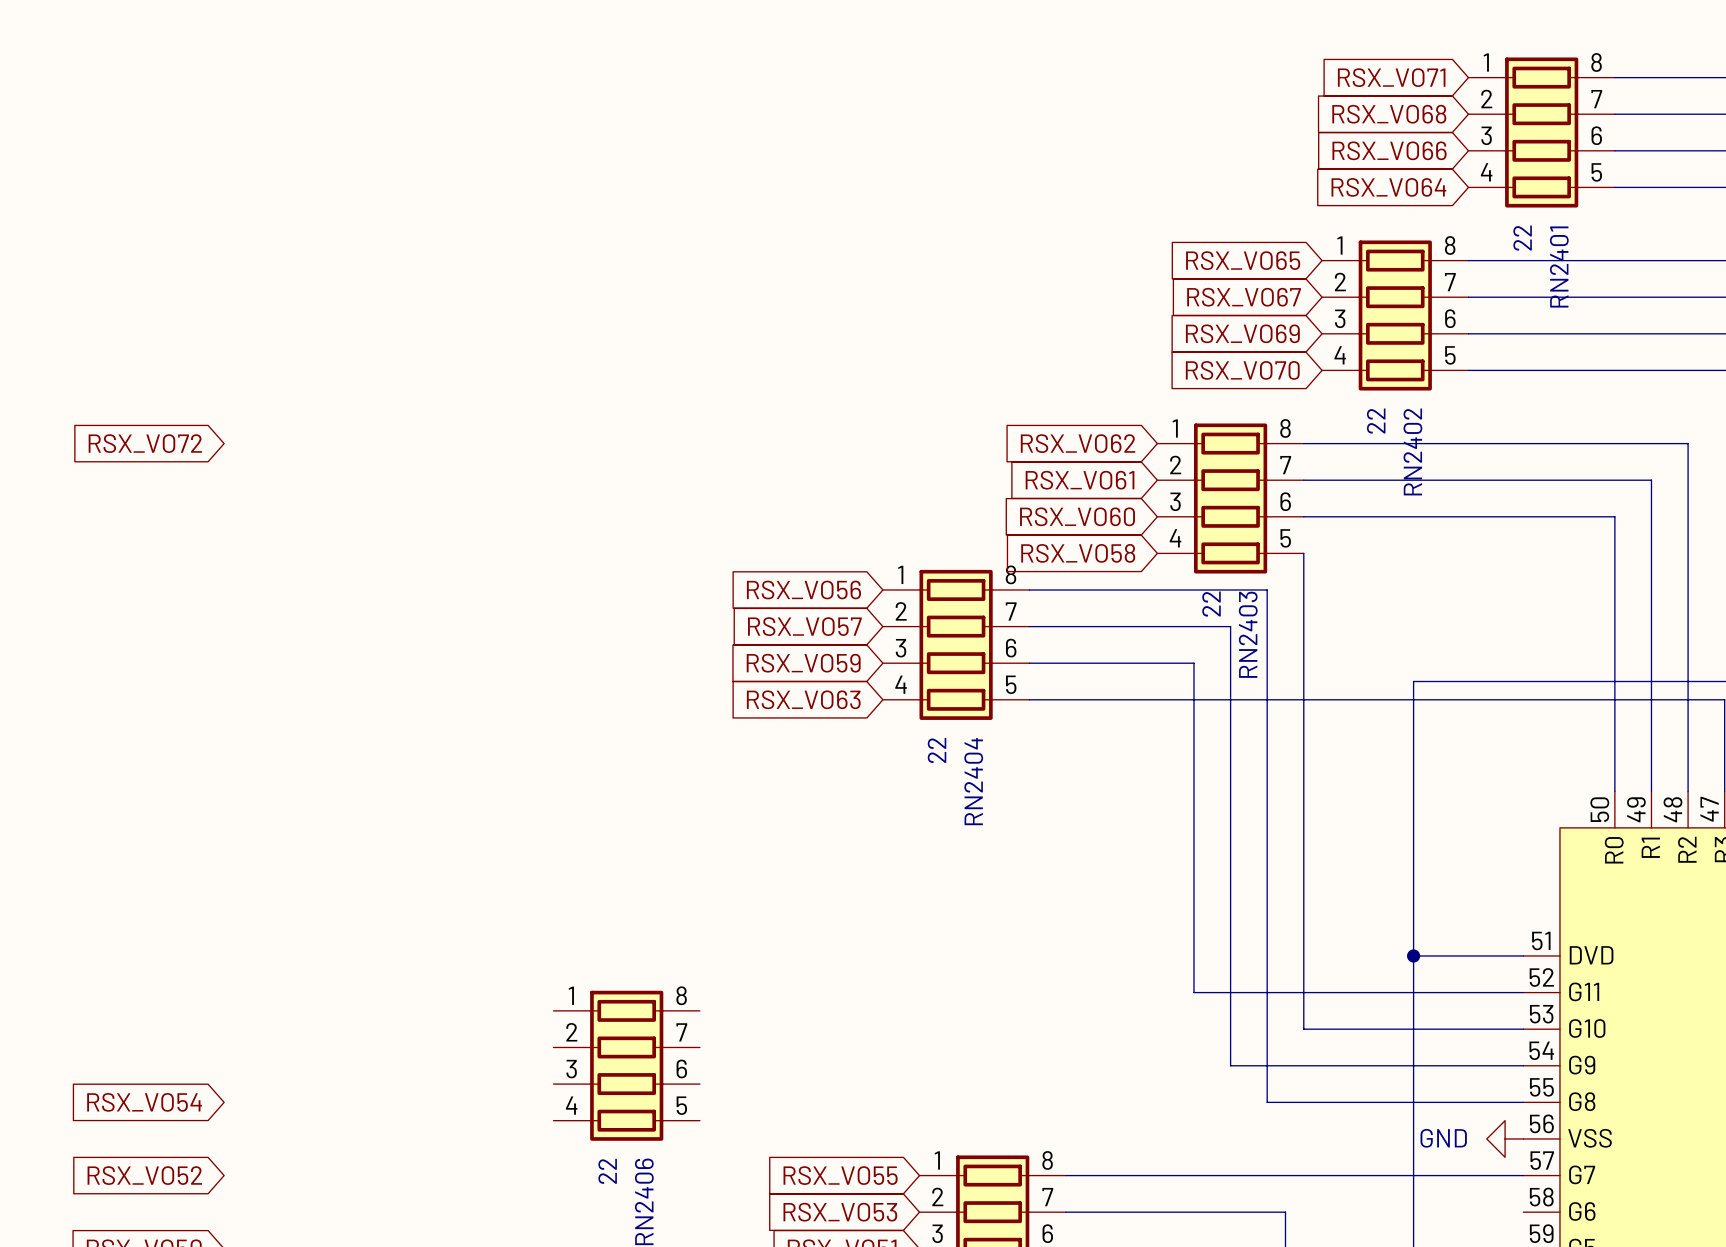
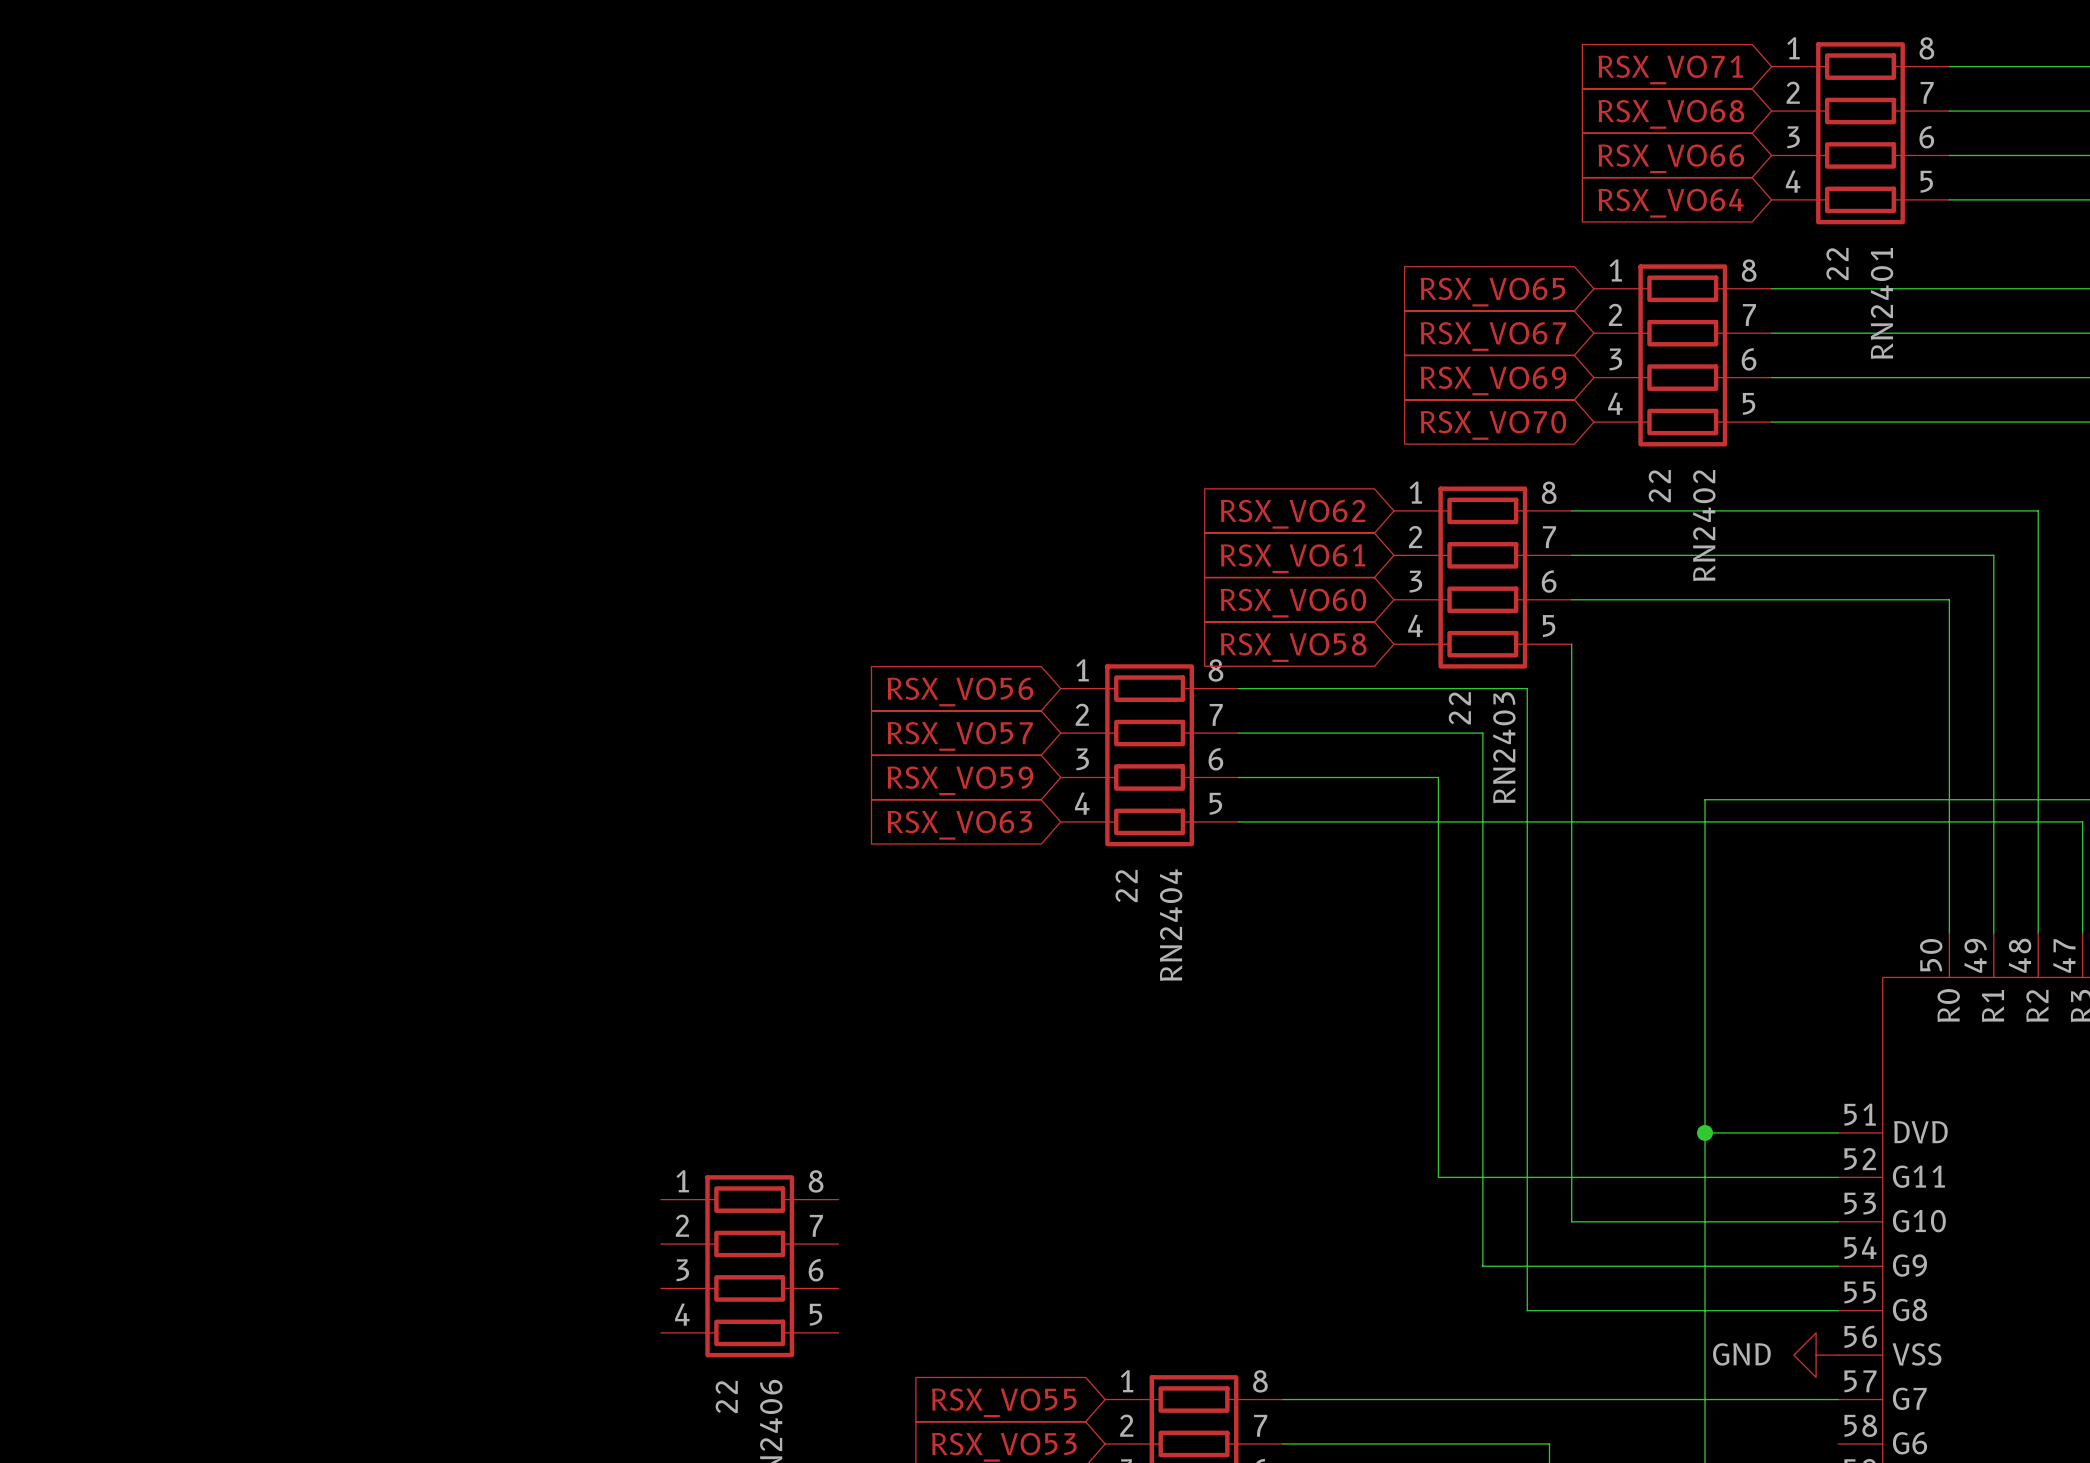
global label: RSX_VO72 (145, 443) -> none
global label: RSX_VO54 (144, 1102) -> none
global label: RSX_VO52 (144, 1175) -> none

